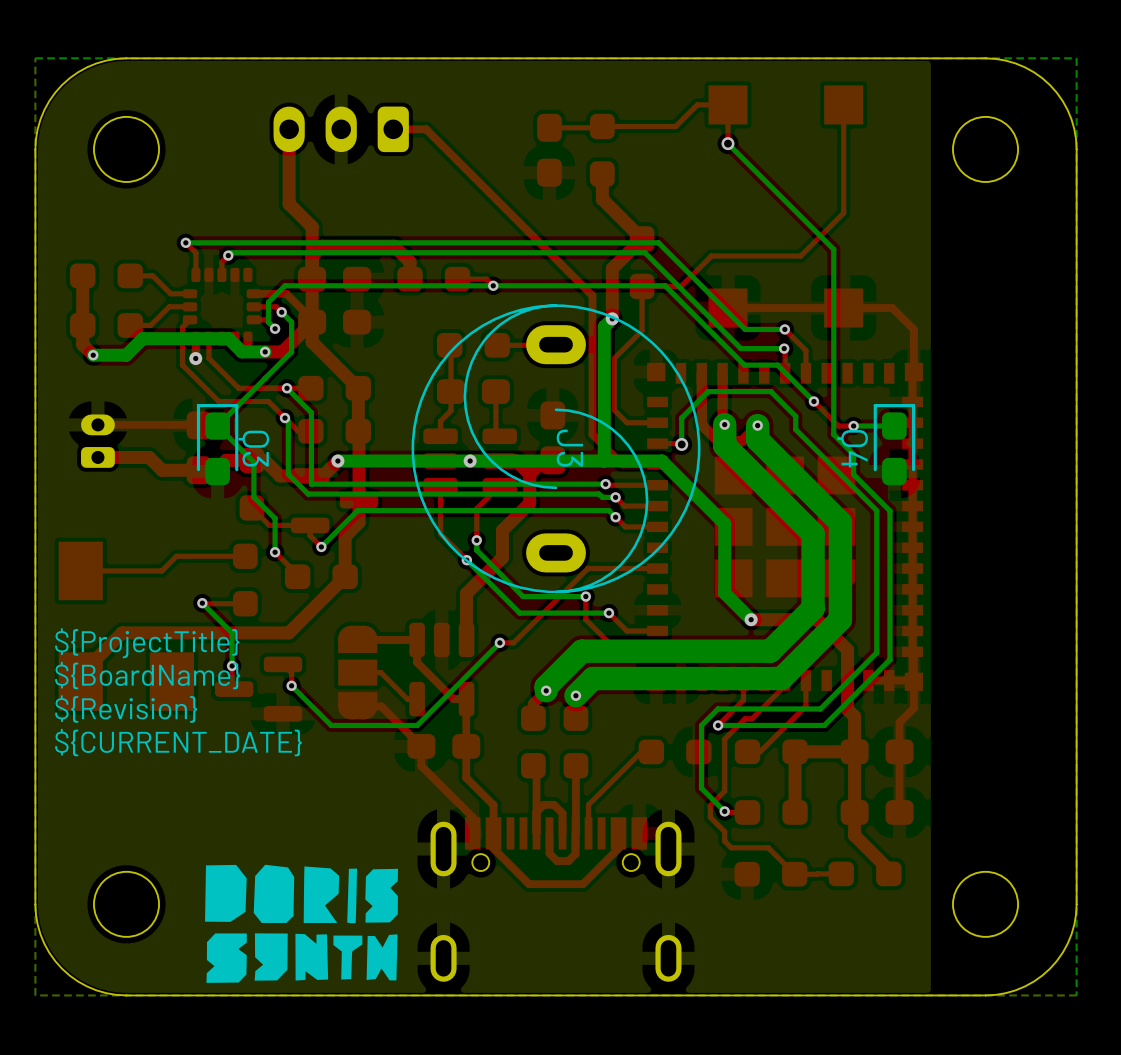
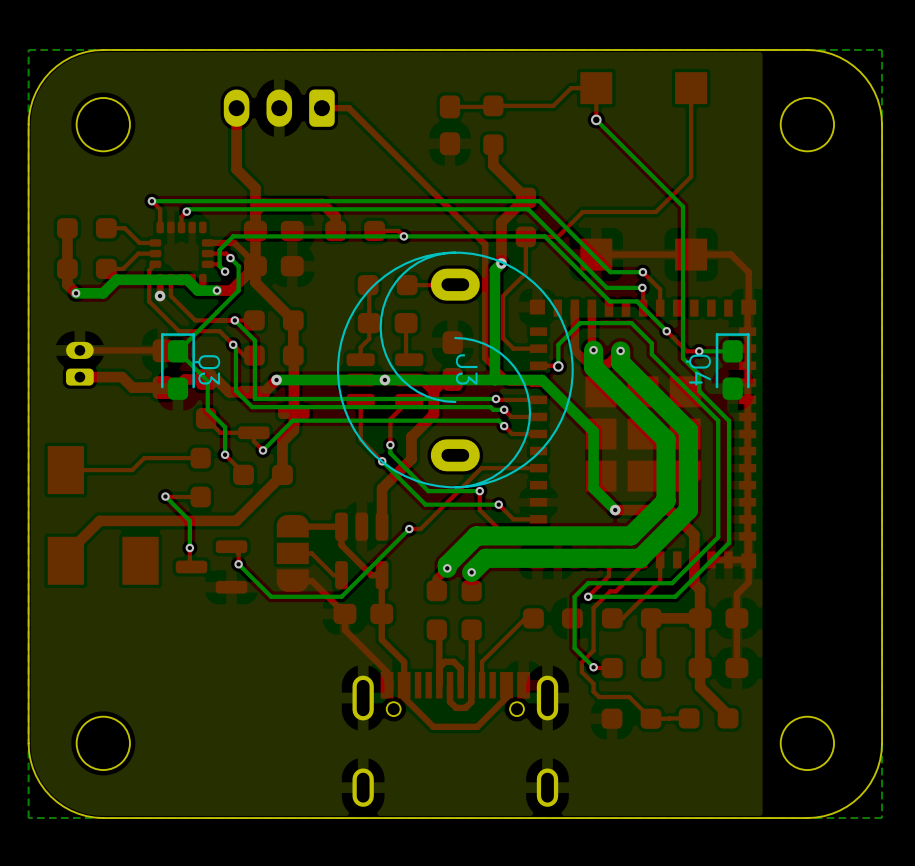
text: ${ProjectTitle} (147, 643) -> none
text: ${BoardName} (147, 675) -> none
text: ${Revision} (126, 709) -> none
text: ${CURRENT_DATE} (178, 742) -> none
drawing: [205, 864, 399, 983] -> none

